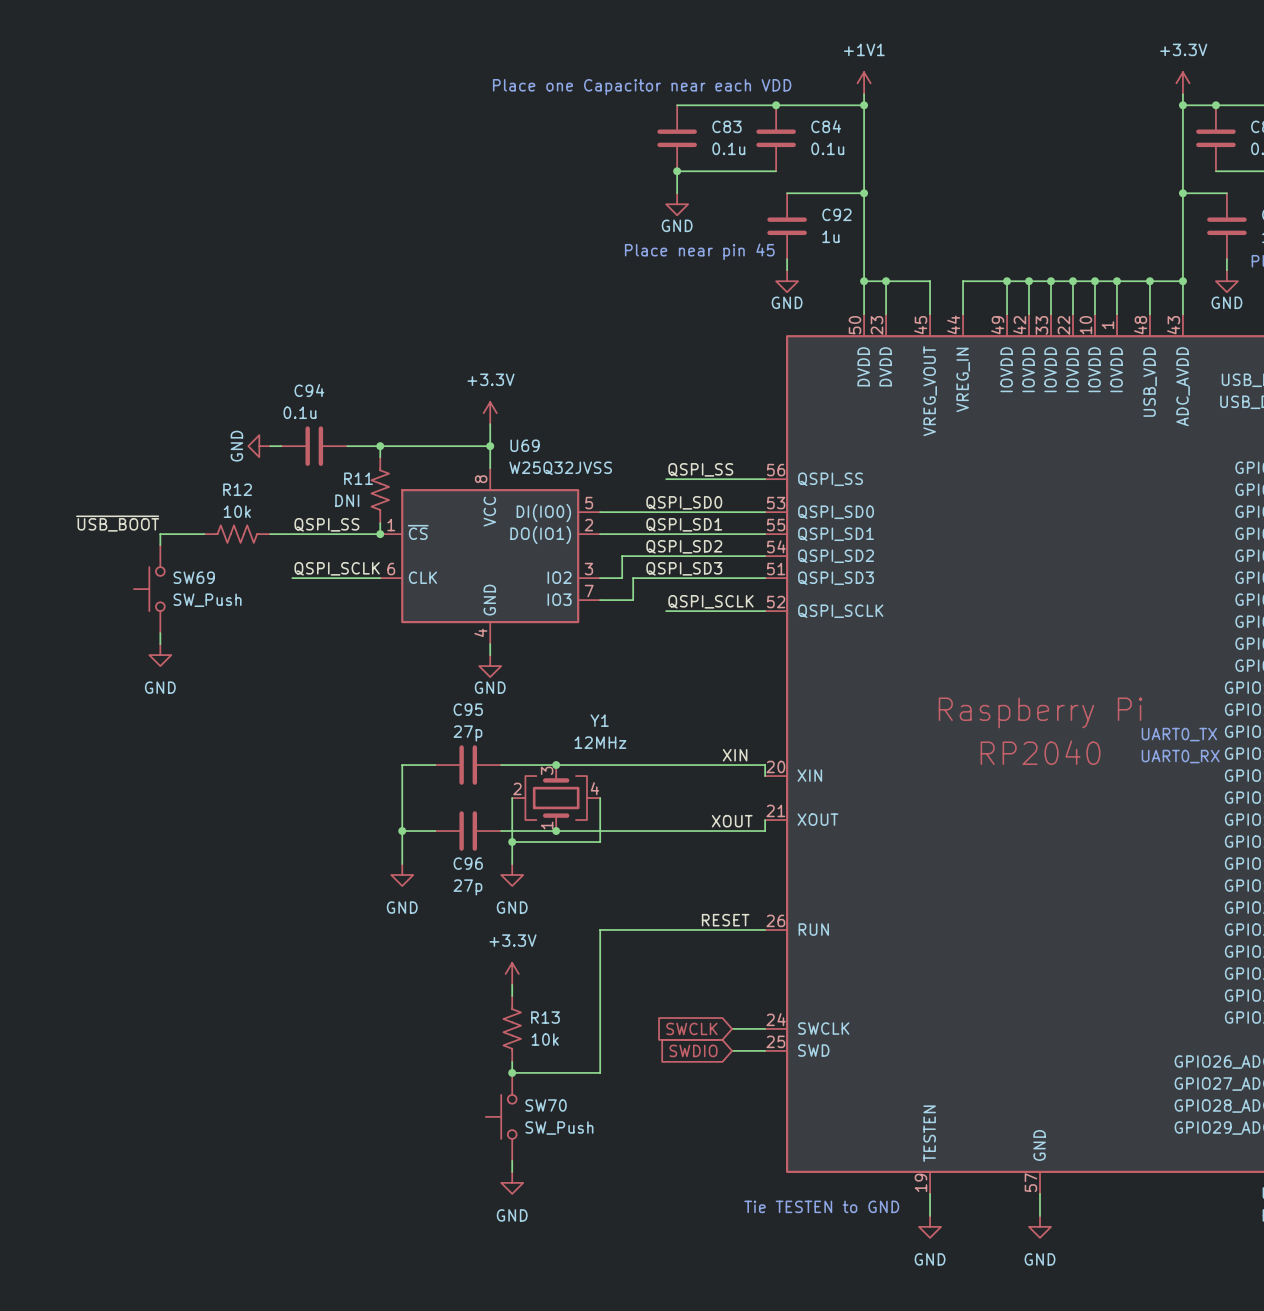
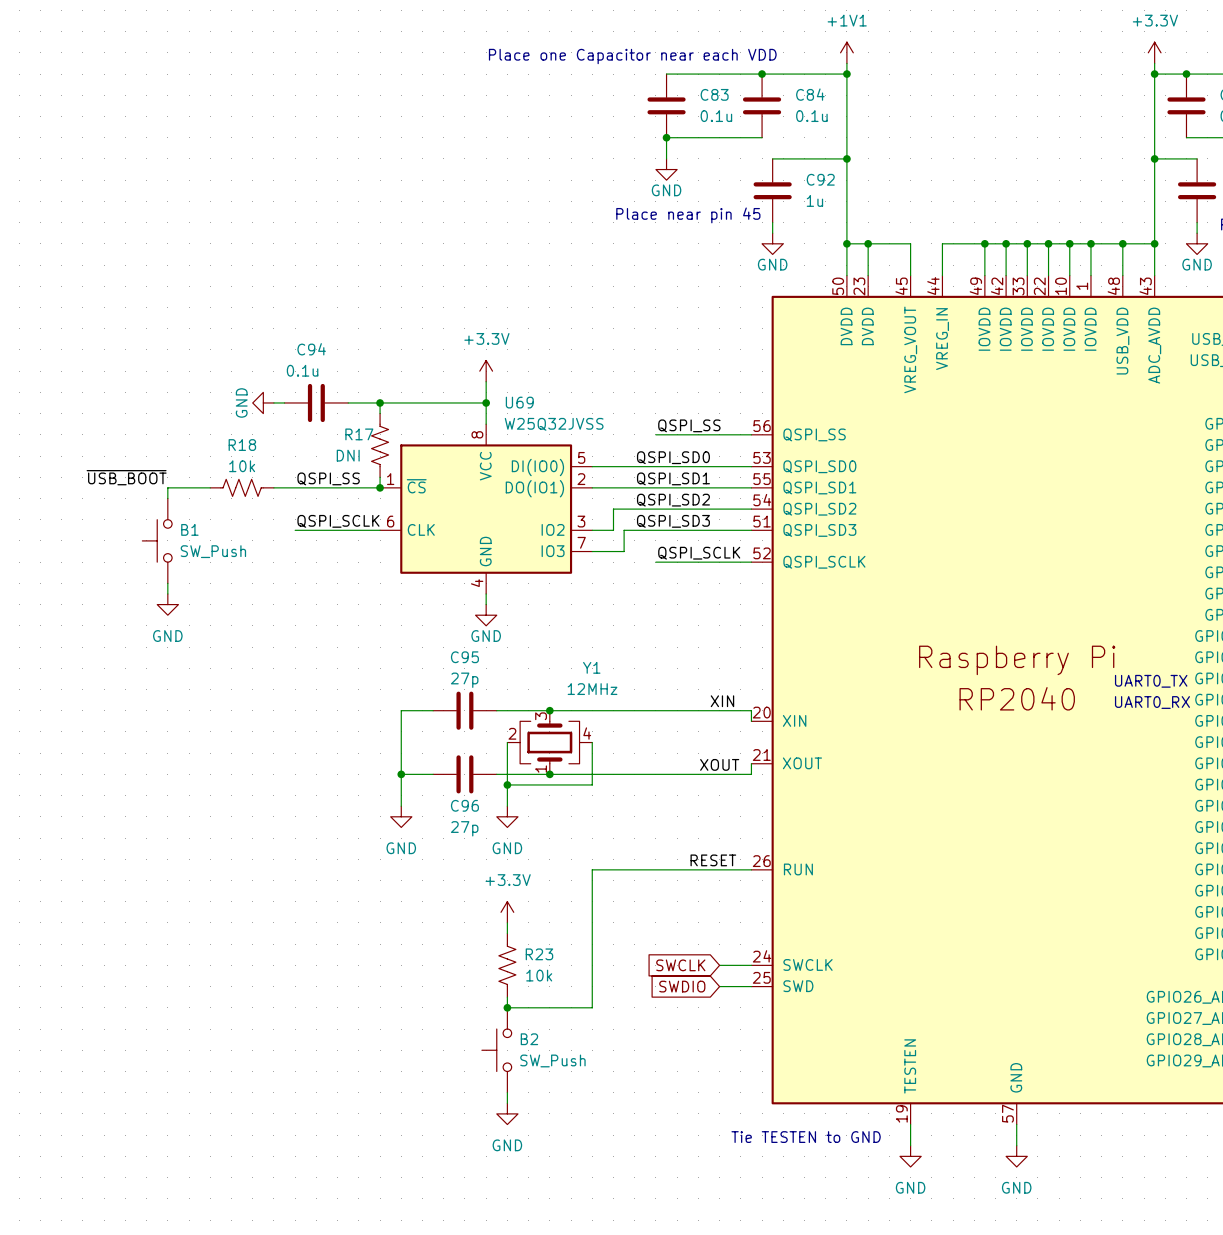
R11 name: R11 (358, 478) -> R17 (359, 434)
R12 name: R12 (237, 489) -> R18 (242, 445)
SW69 name: SW69 (194, 577) -> B1 (189, 529)
R13 name: R13 (545, 1017) -> R23 (539, 954)
SW70 name: SW70 (546, 1105) -> B2 (529, 1039)

